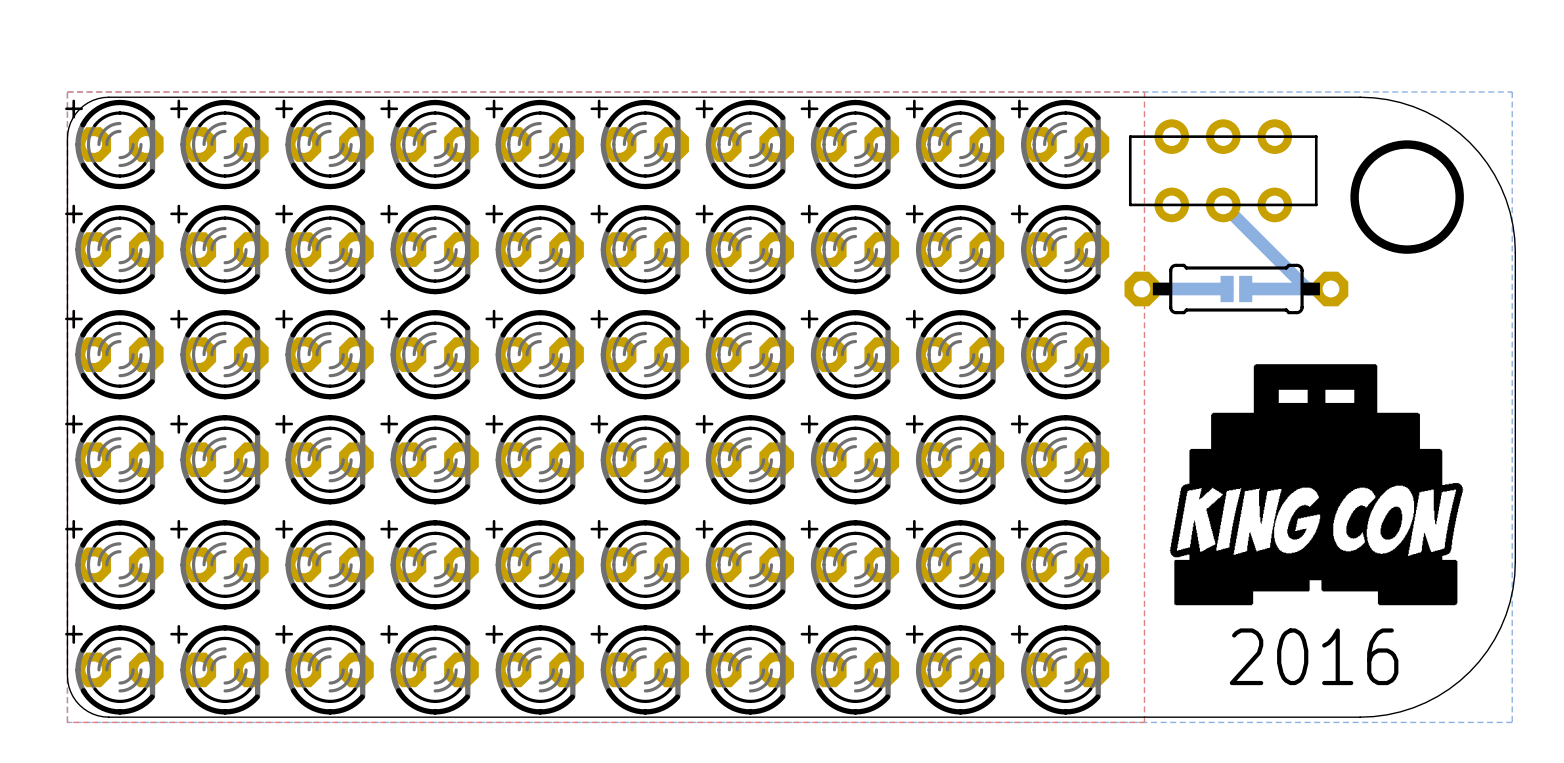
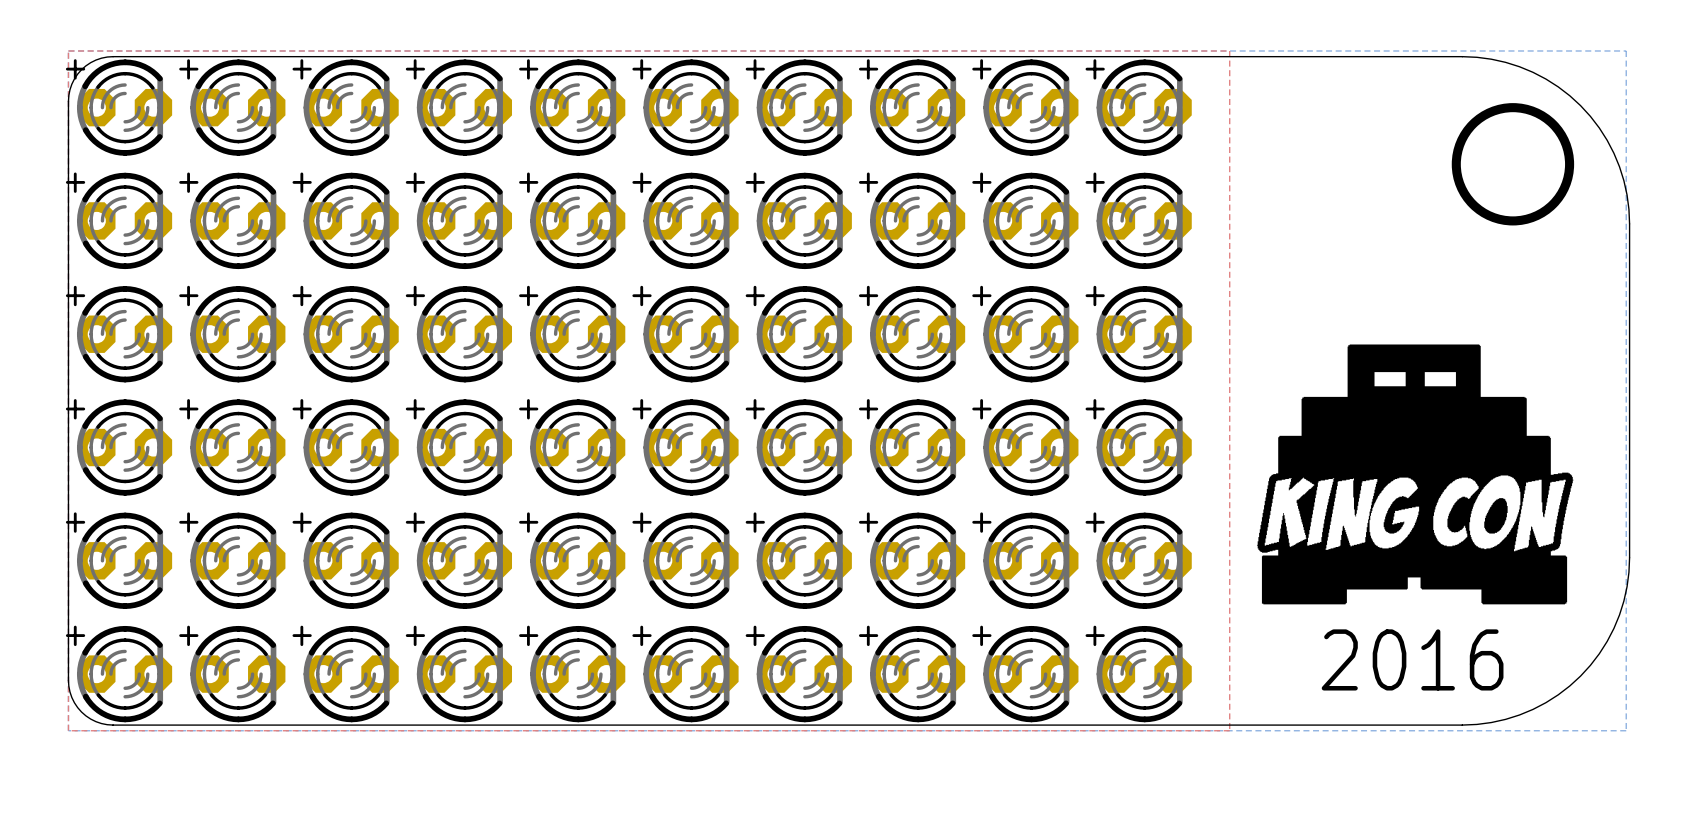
part: (1223, 170) -> none
bottom track: (1223, 204) (1307, 288) -> none
bottom track: (1141, 288) (1227, 288) -> none
part: (1236, 288) -> none
part: (1236, 288) -> none
bottom track: (1245, 288) (1330, 288) -> none

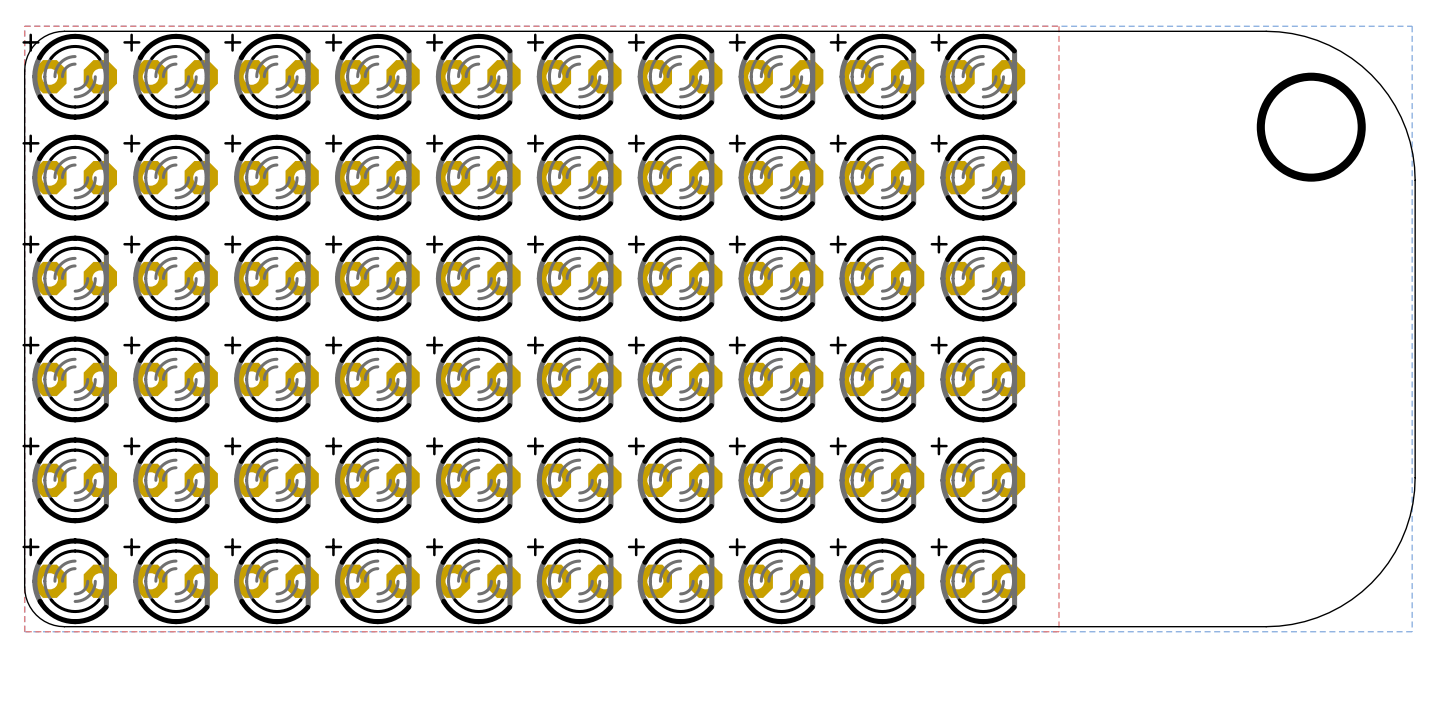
drawing: [1256, 344, 1574, 605] -> none
text: 2016 (1412, 659) -> none

